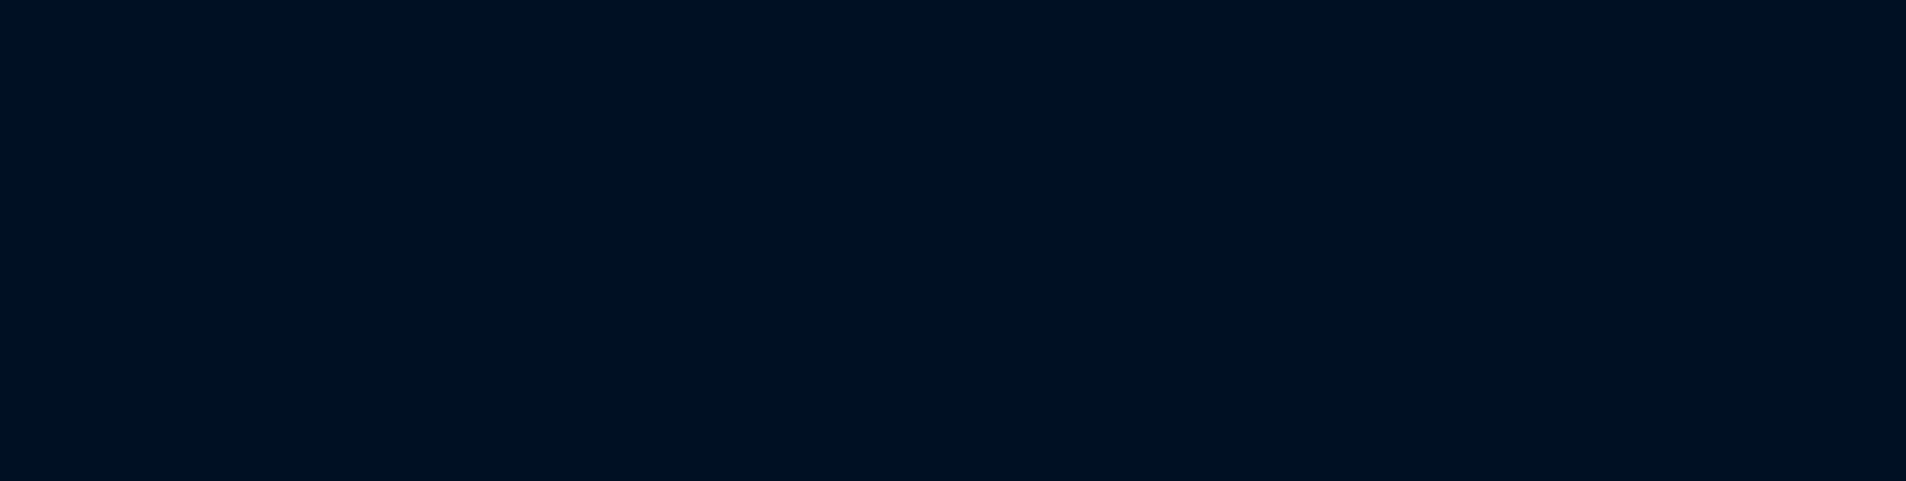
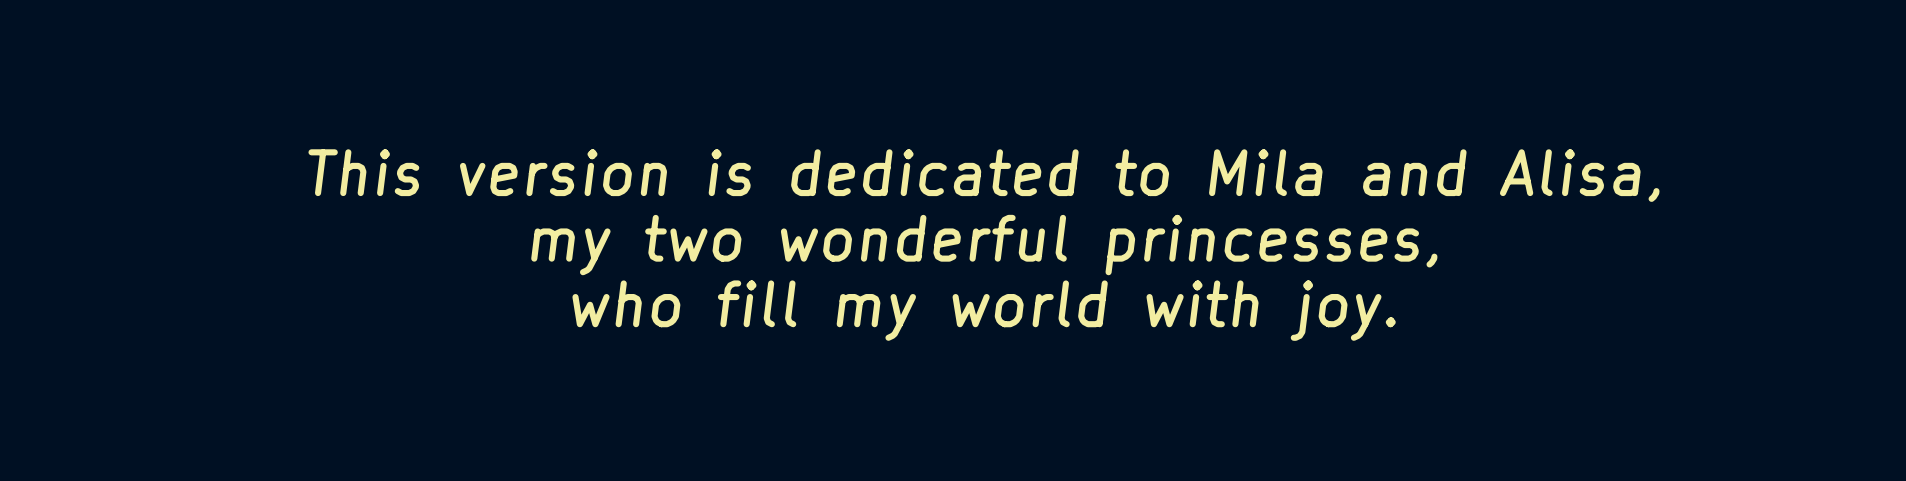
text: none -> This version is dedicated to Mila and Alisa, (983, 175)
text: none -> my two wonderful princesses, (984, 245)
text: none -> who fill my world with joy. (984, 310)

